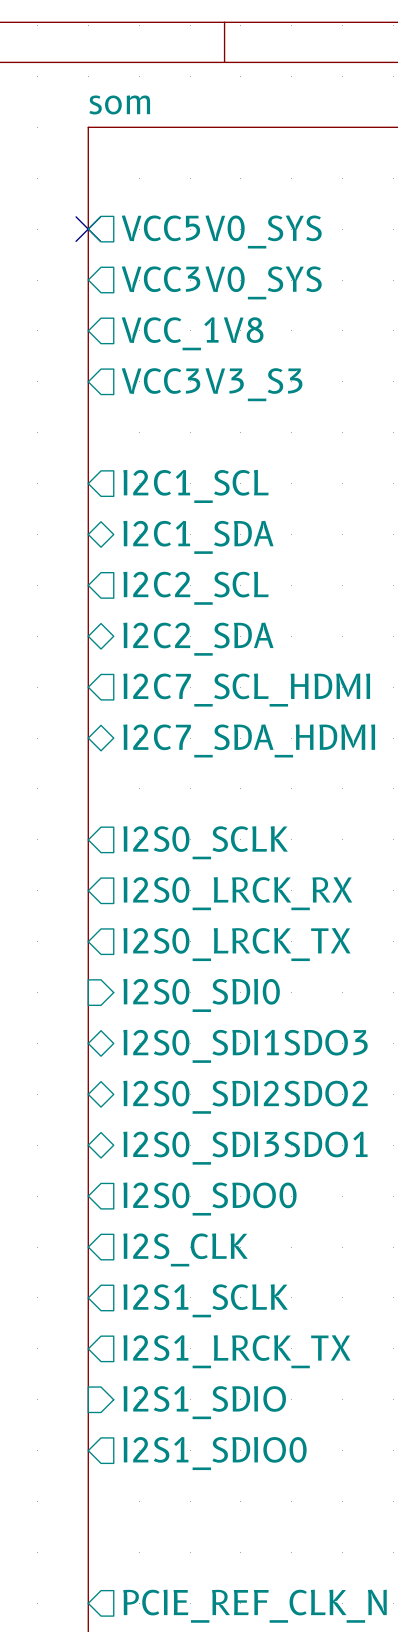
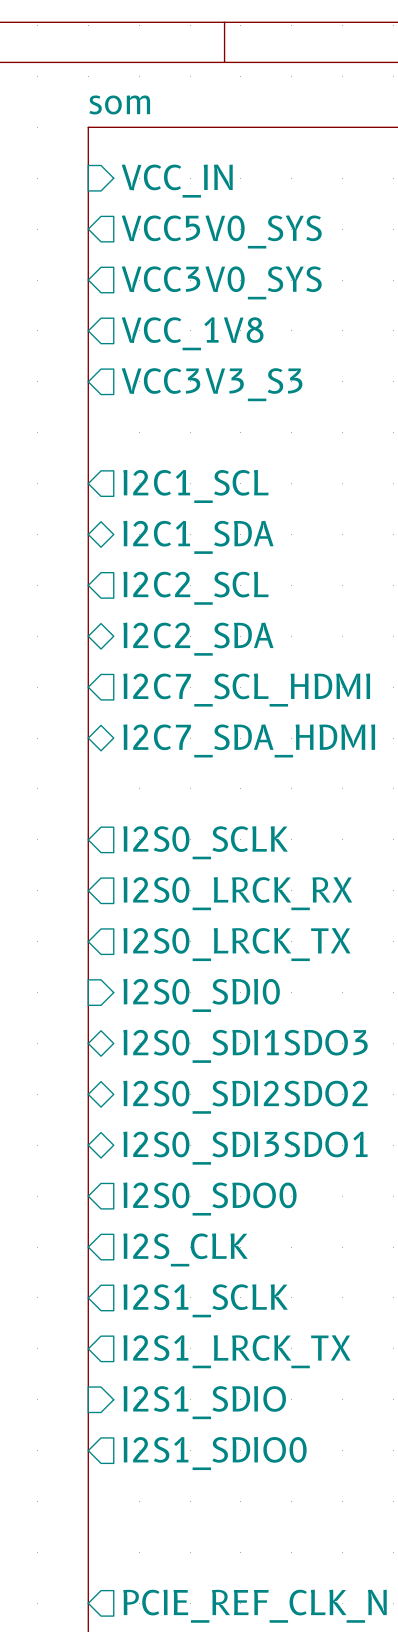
sheet pin: none -> VCC_IN (177, 181)
no-connect mark: (88, 229) -> none

